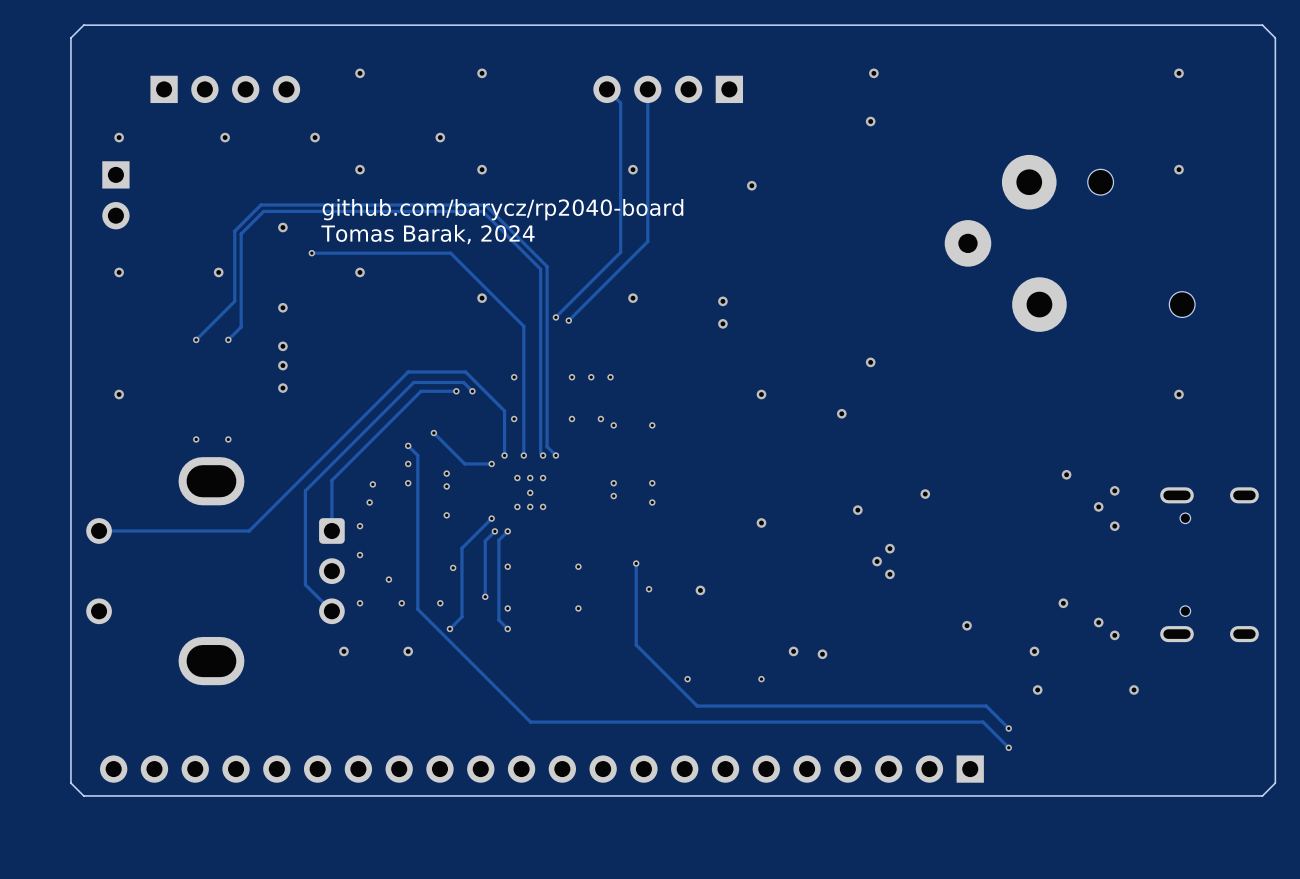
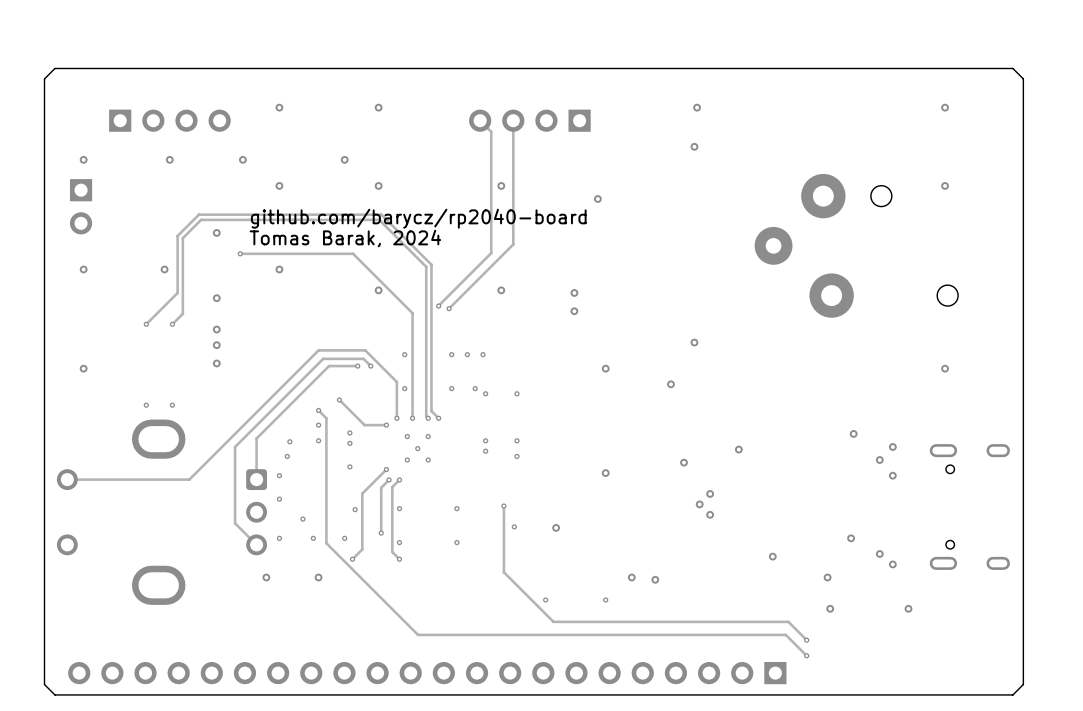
via: (530, 478) -> none
via: (530, 506) -> none

